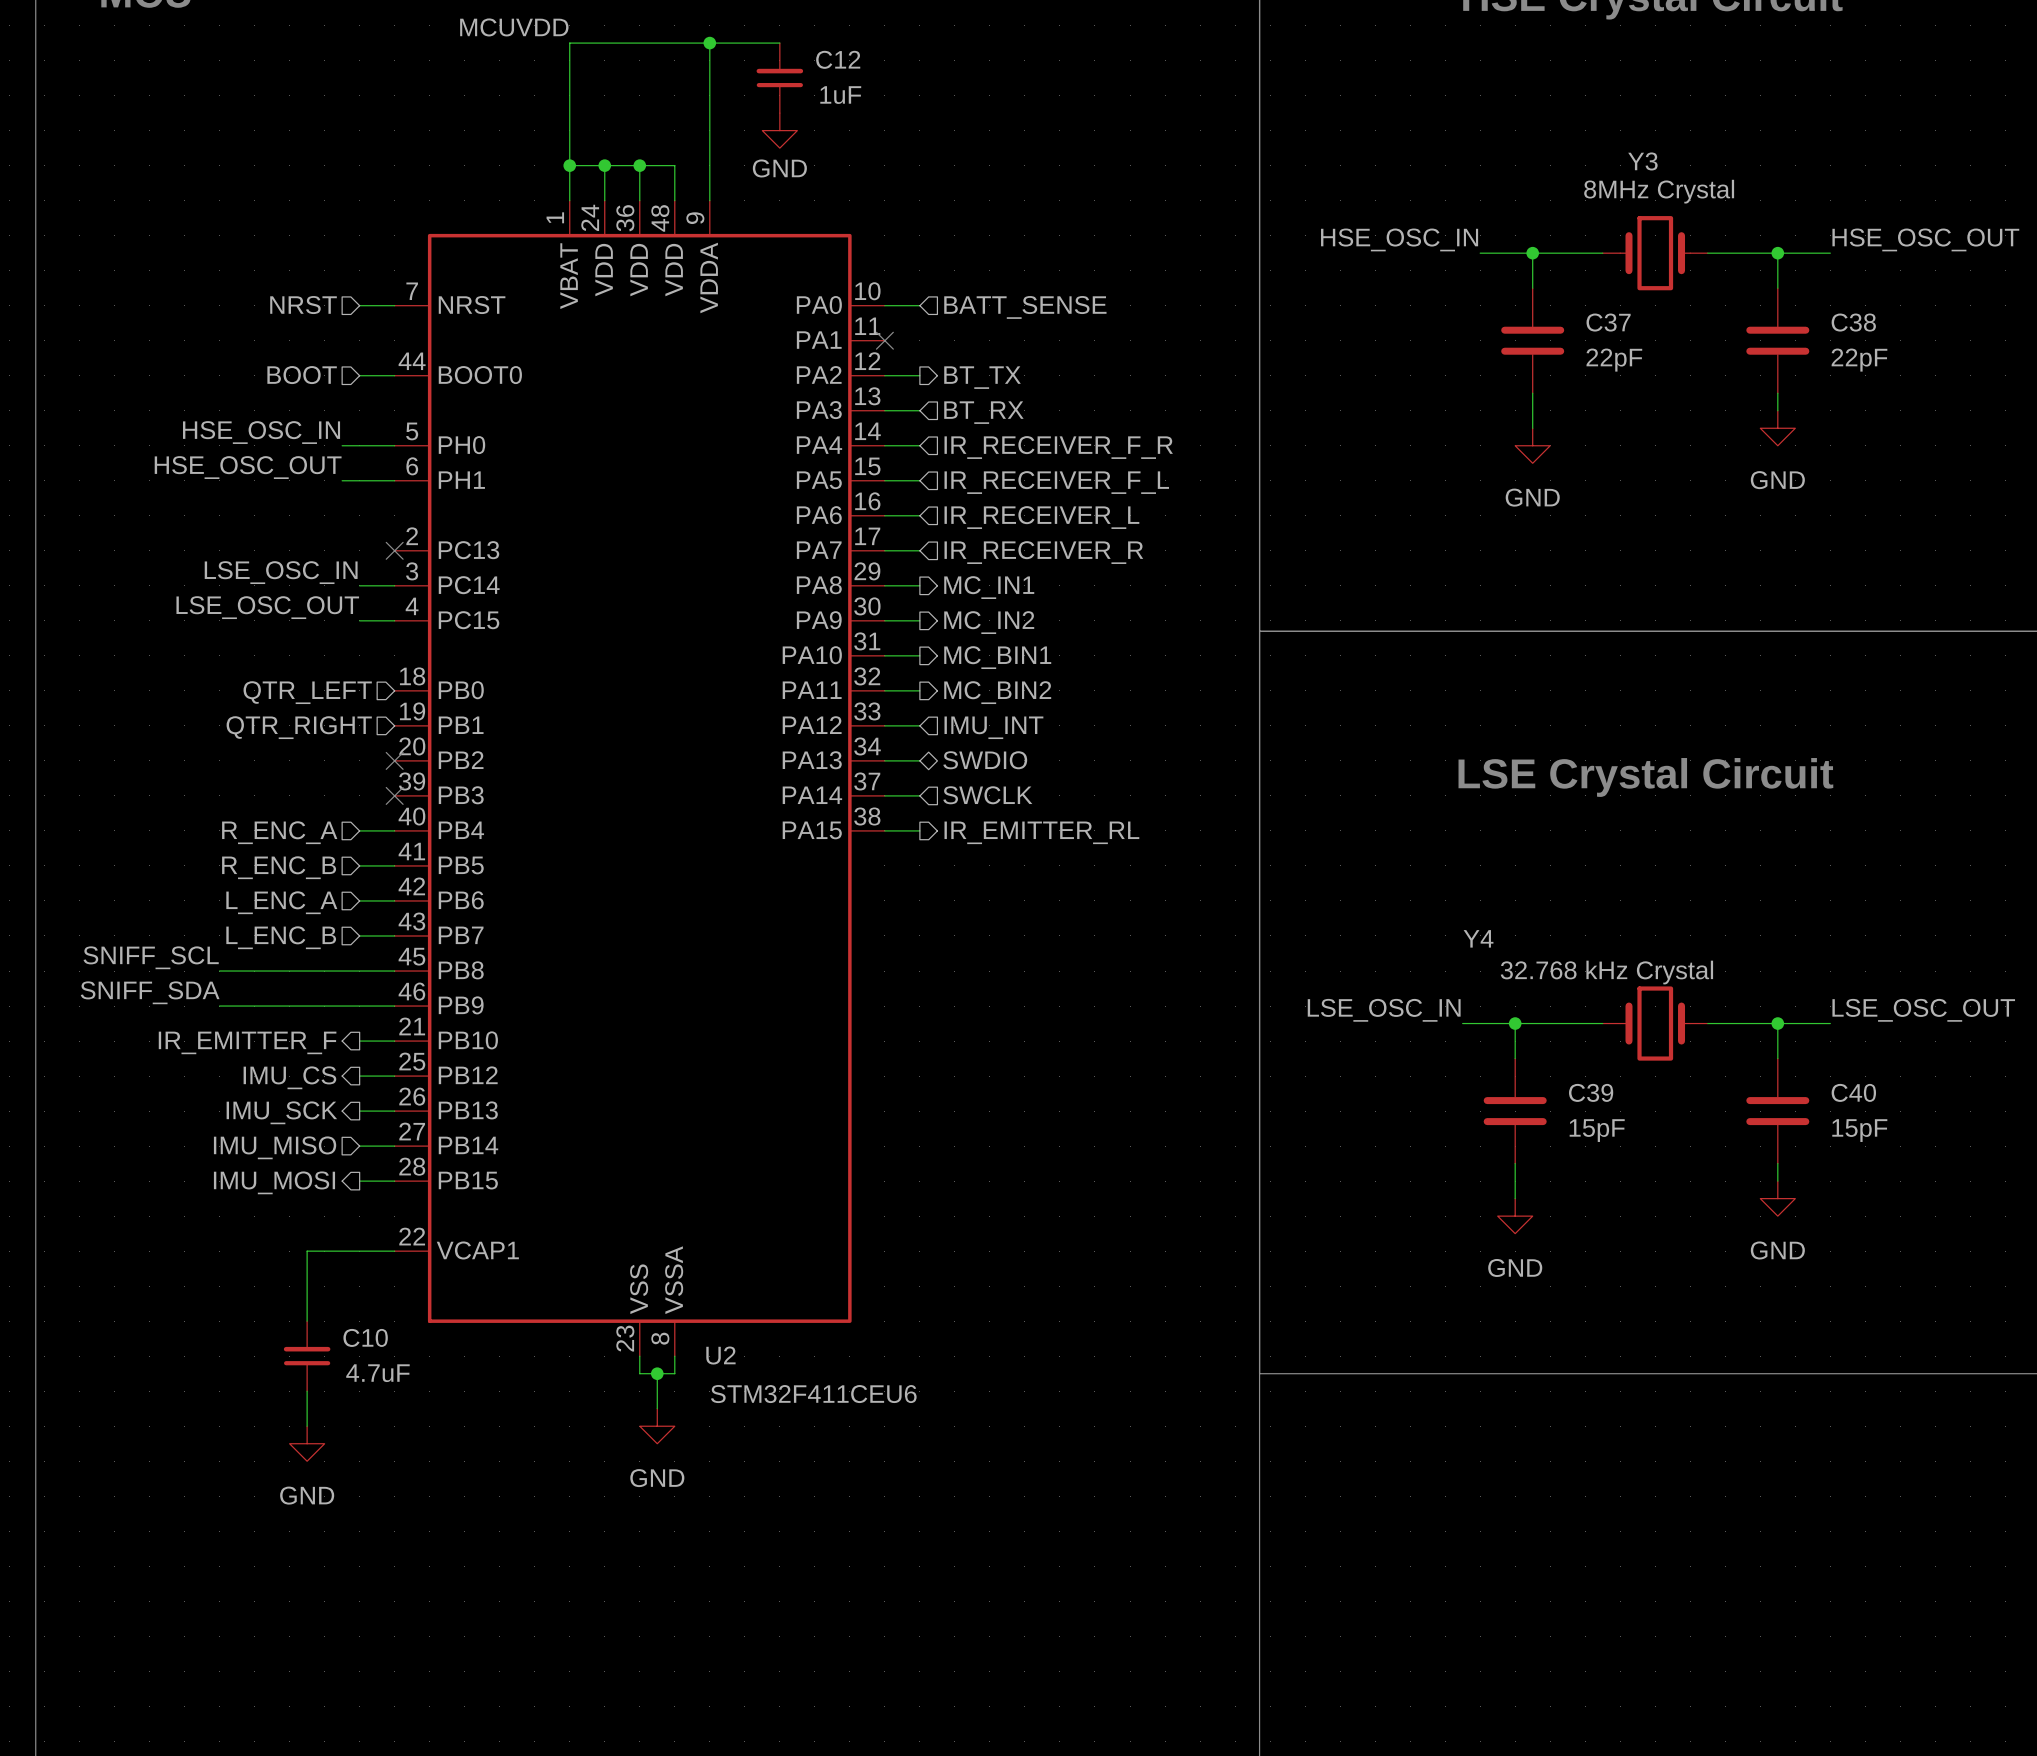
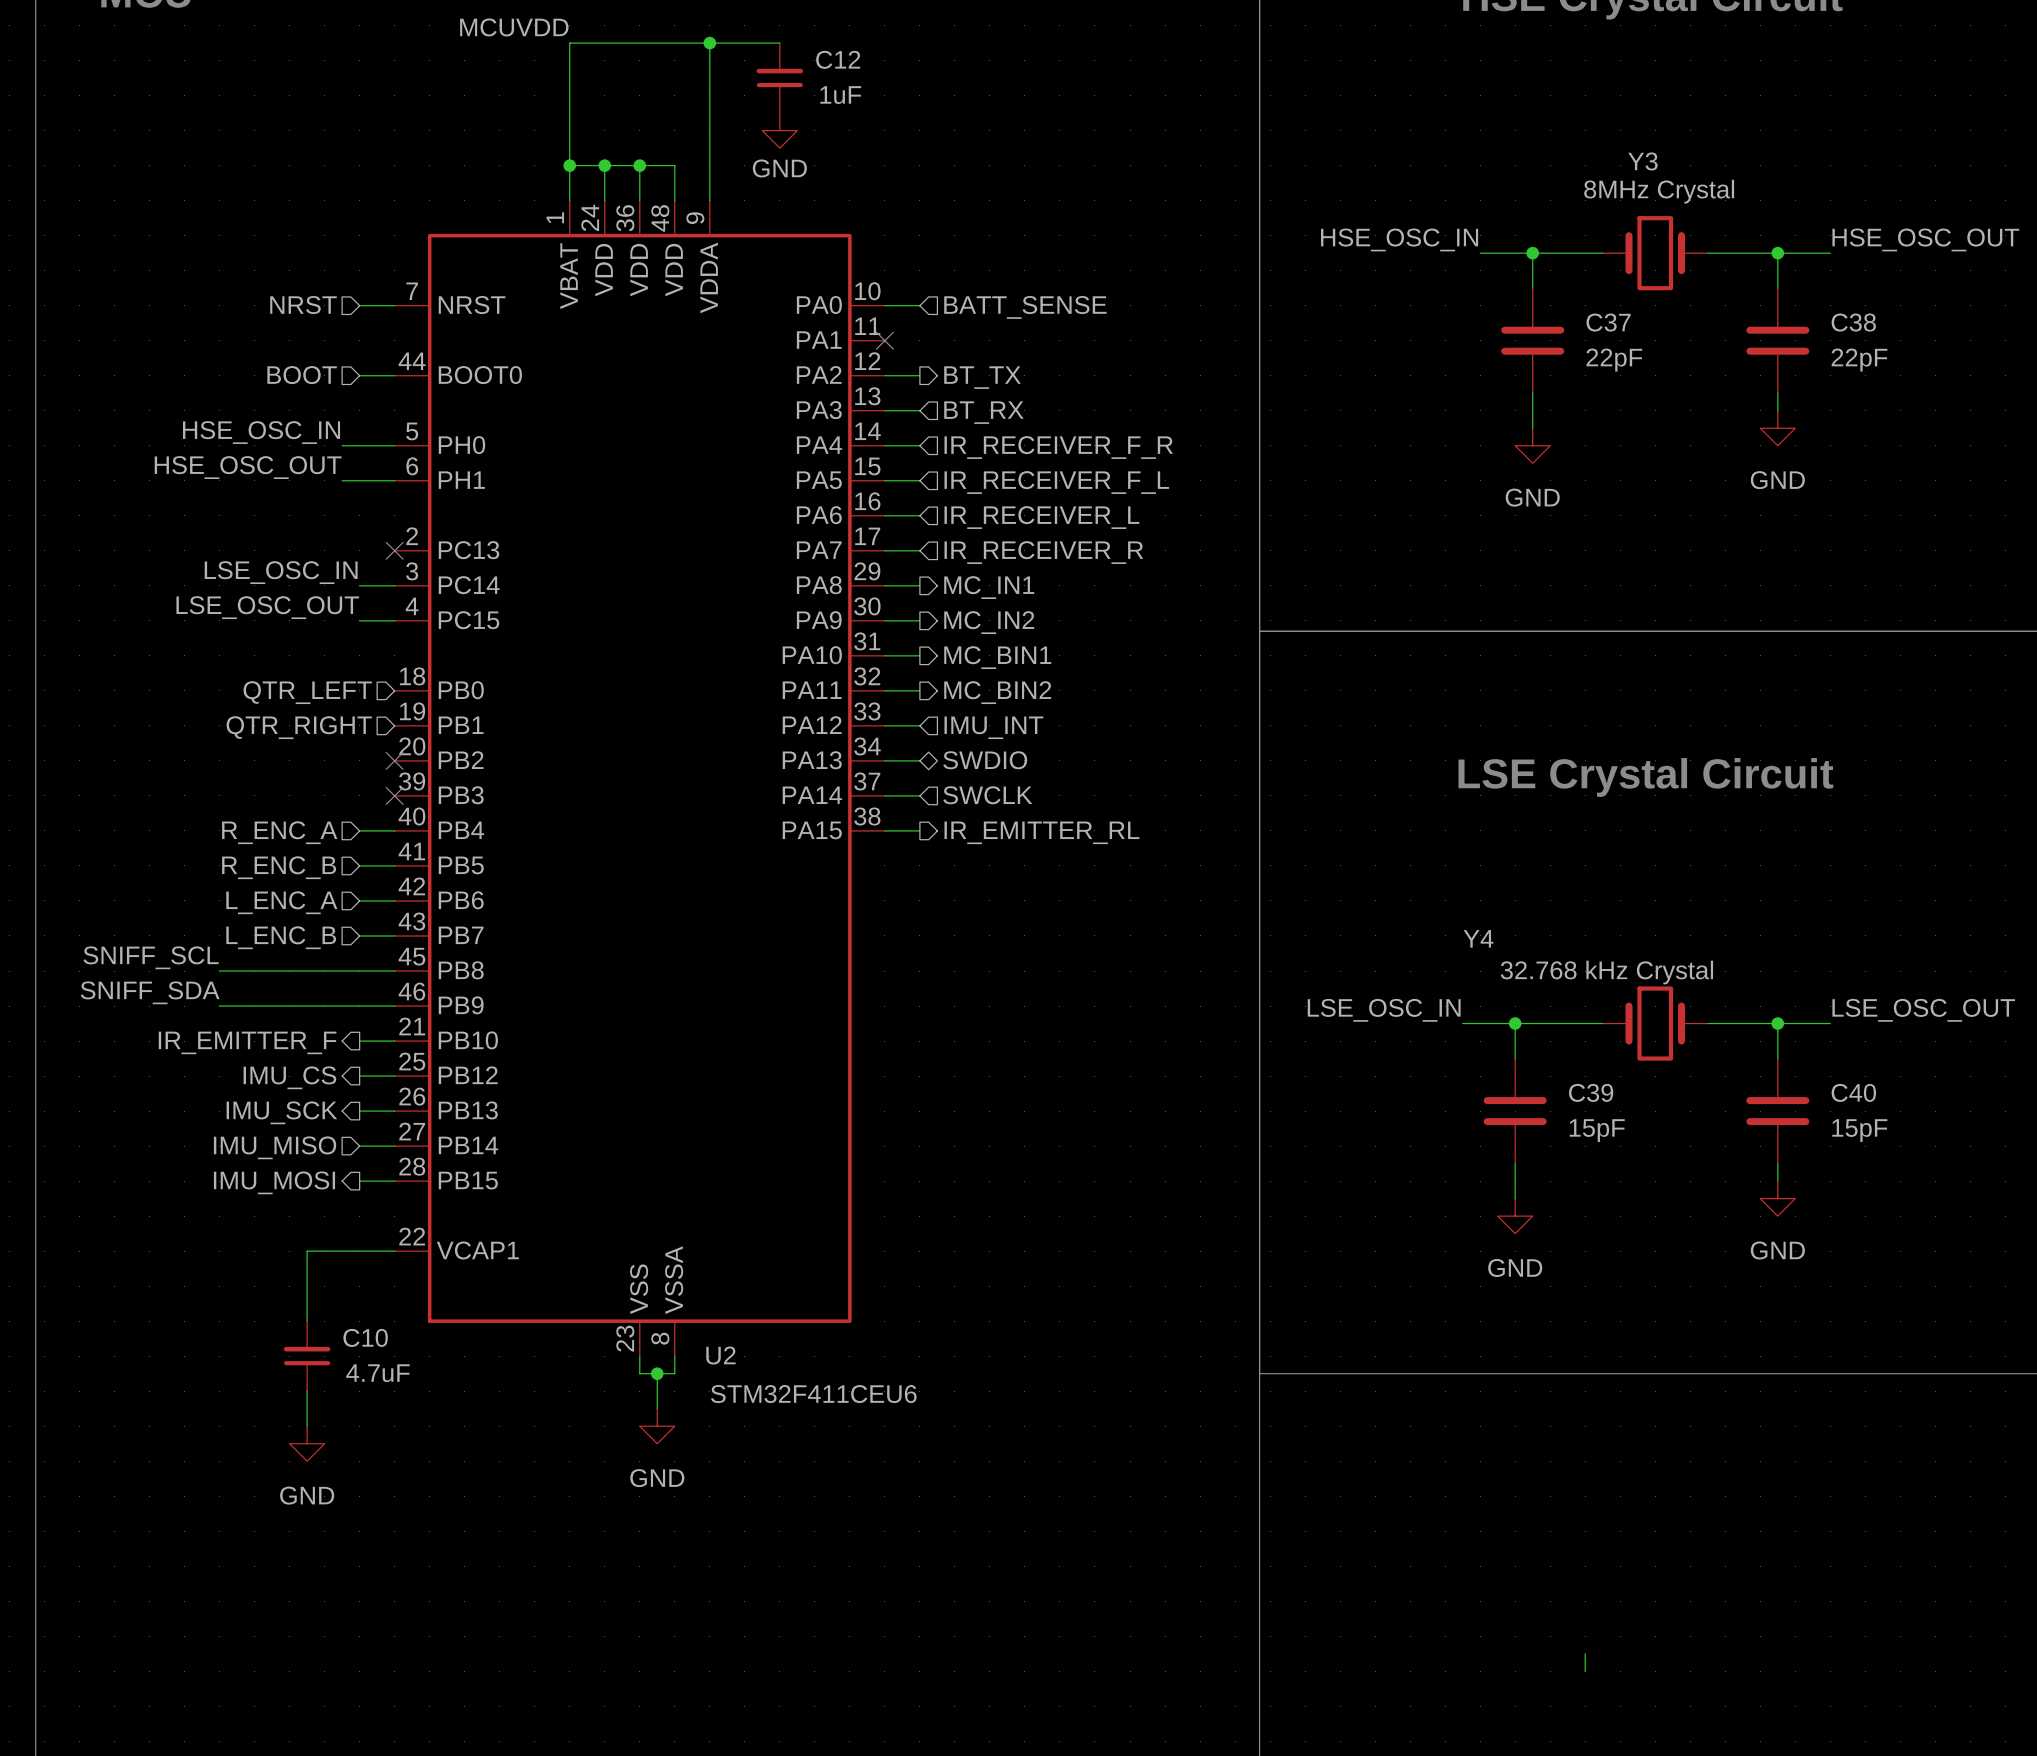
wire: none -> (1585, 1653) (1585, 1671)

